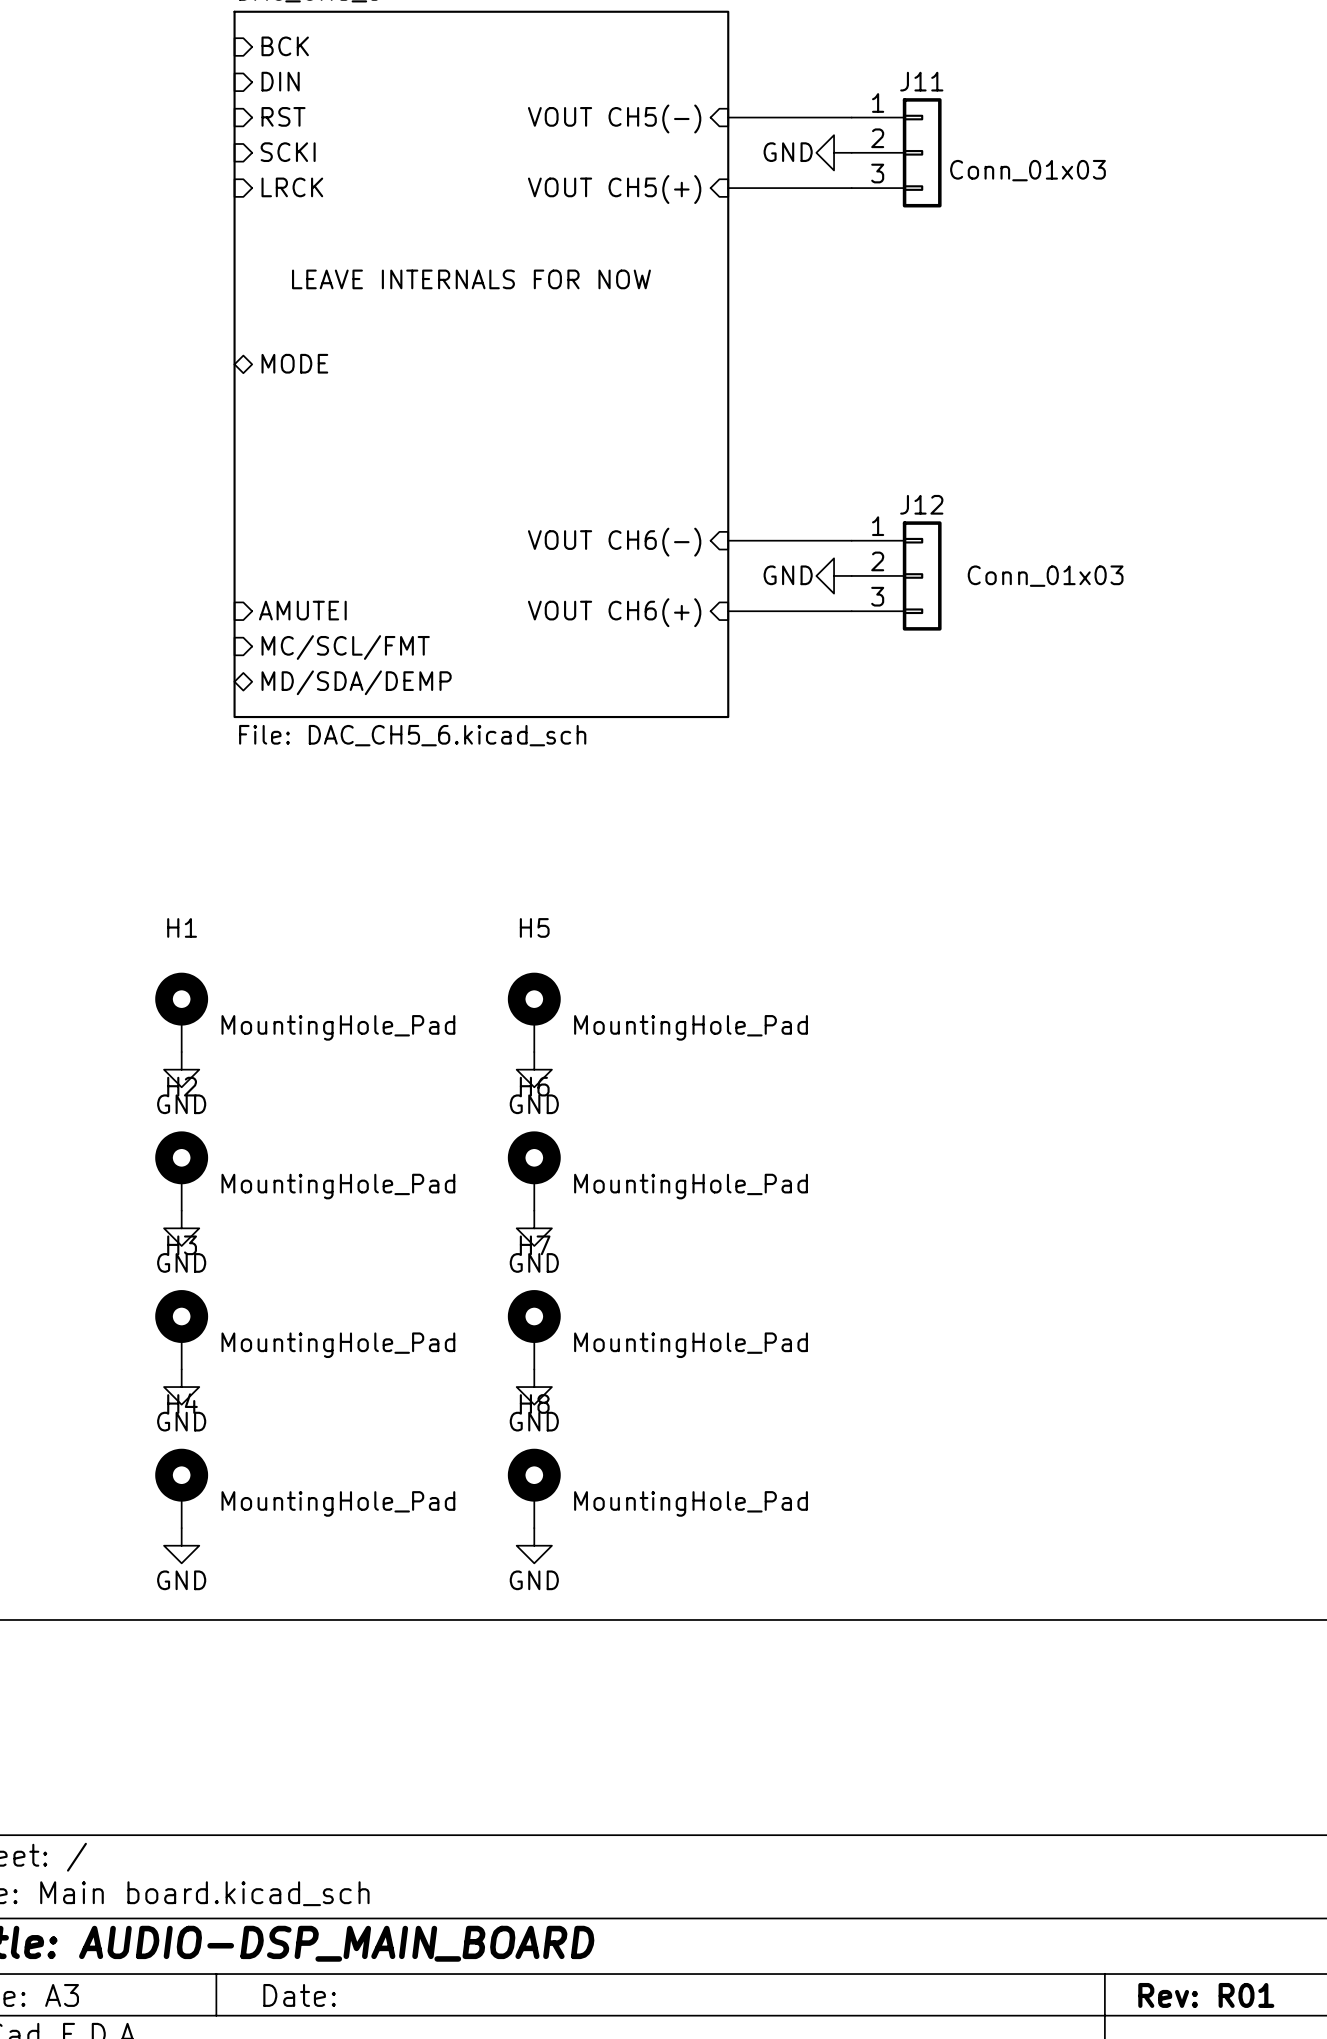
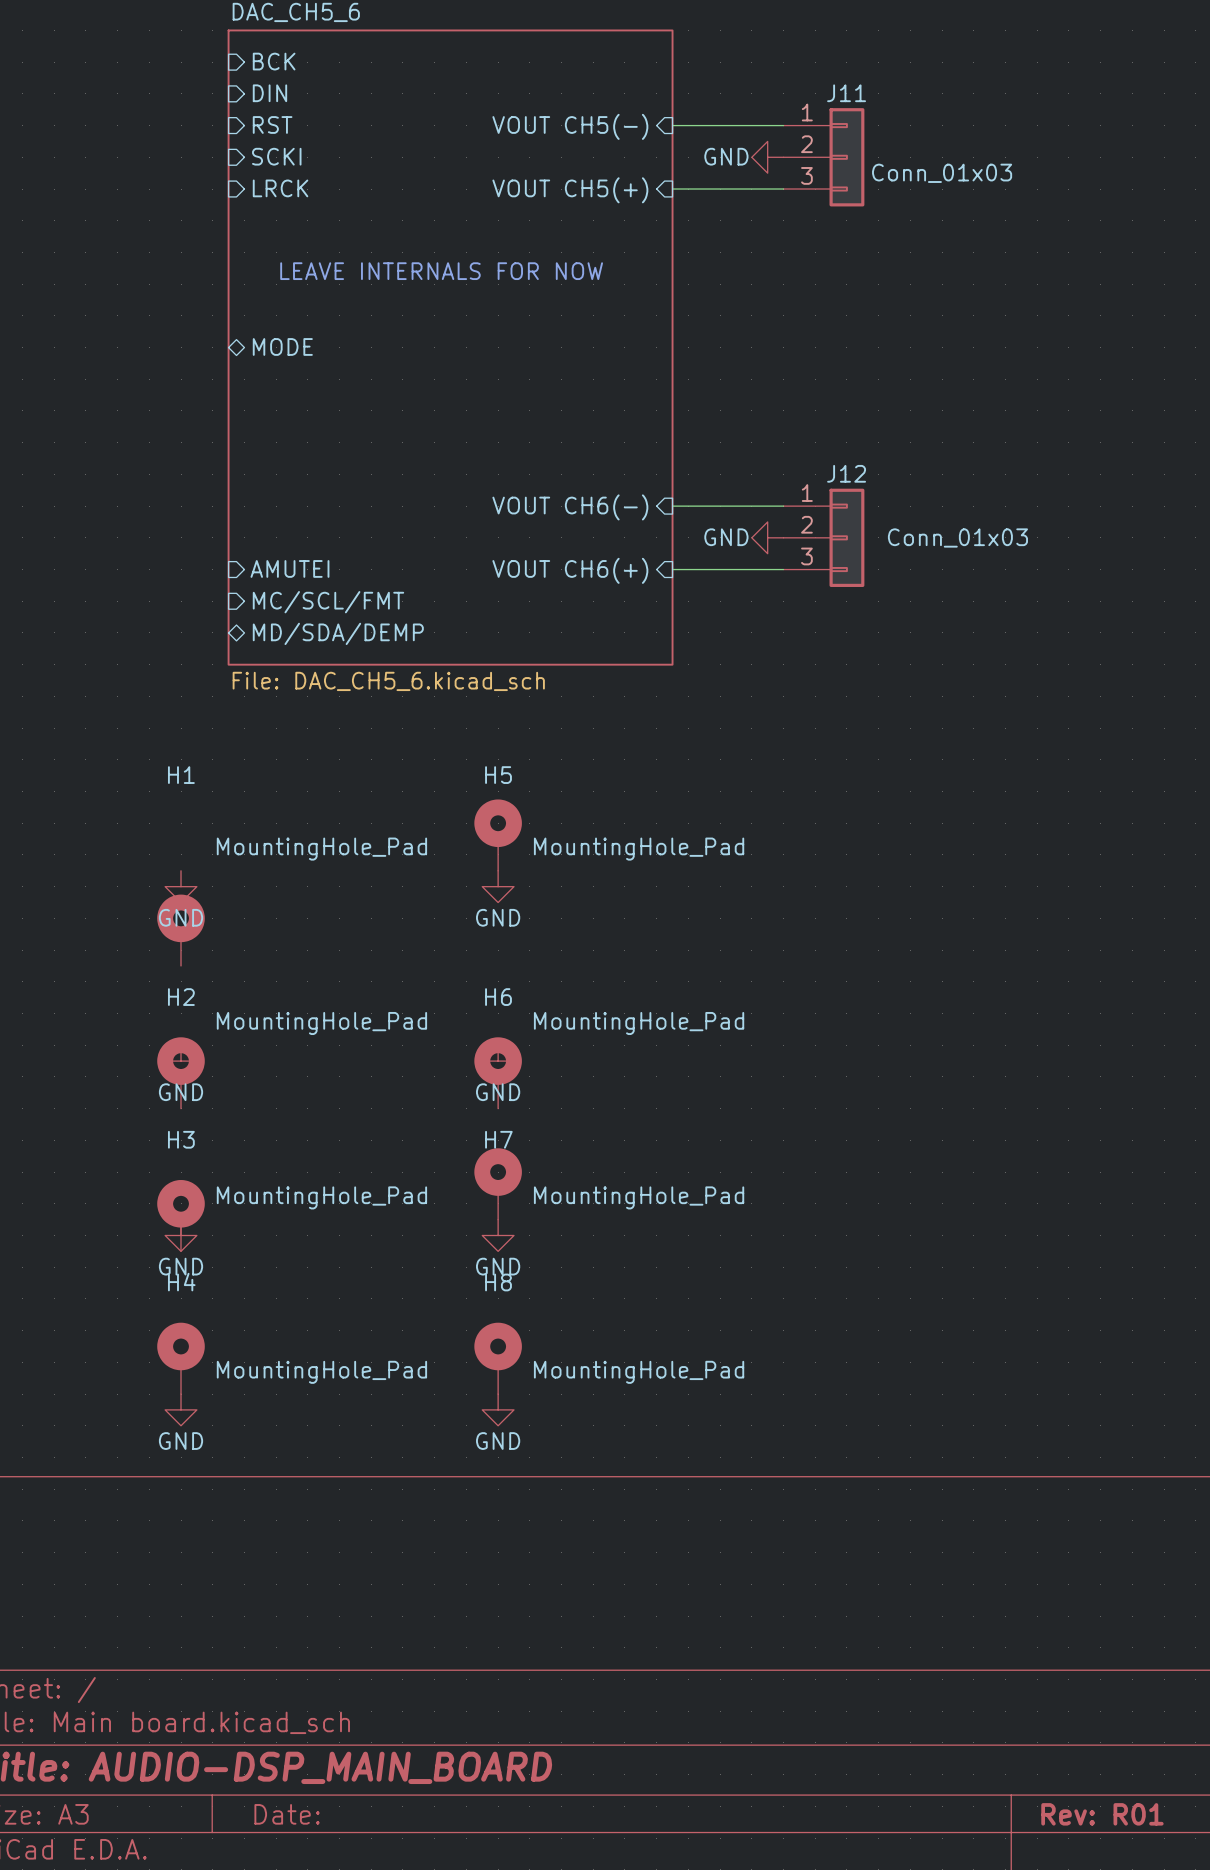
H1 name position: H1 (182, 927) -> H1 (181, 775)
H5 name position: H5 (534, 927) -> H5 (498, 775)
power symbol: none -> GND (181, 886)
power symbol: none -> GND (498, 886)
H5 position: (534, 1012) -> (498, 835)
H1 value position: MountingHole_Pad (338, 1027) -> MountingHole_Pad (321, 849)
power symbol: GND (181, 1069) -> none
power symbol: GND (534, 1069) -> none
power symbol: none -> GND (181, 1061)
power symbol: none -> GND (498, 1061)
H2 value position: MountingHole_Pad (338, 1186) -> MountingHole_Pad (321, 1023)
H6 value position: MountingHole_Pad (691, 1186) -> MountingHole_Pad (639, 1023)
power symbol: GND (181, 1228) -> none
power symbol: GND (534, 1228) -> none
H7 position: (534, 1329) -> (498, 1183)
H3 value position: MountingHole_Pad (338, 1345) -> MountingHole_Pad (321, 1197)
power symbol position: GND (181, 1387) -> GND (181, 1235)
power symbol position: GND (534, 1387) -> GND (498, 1235)

